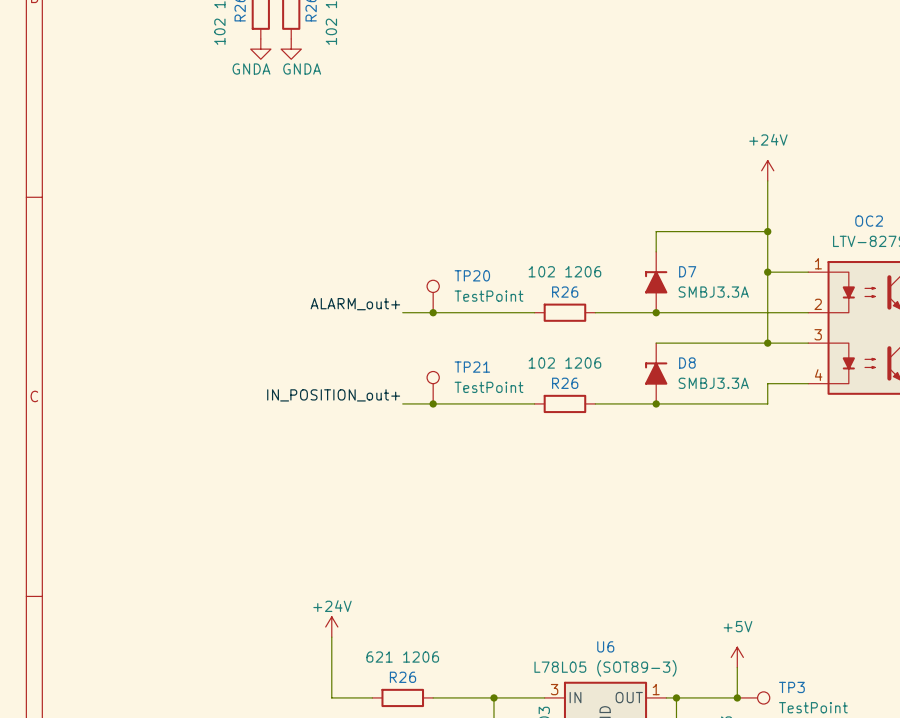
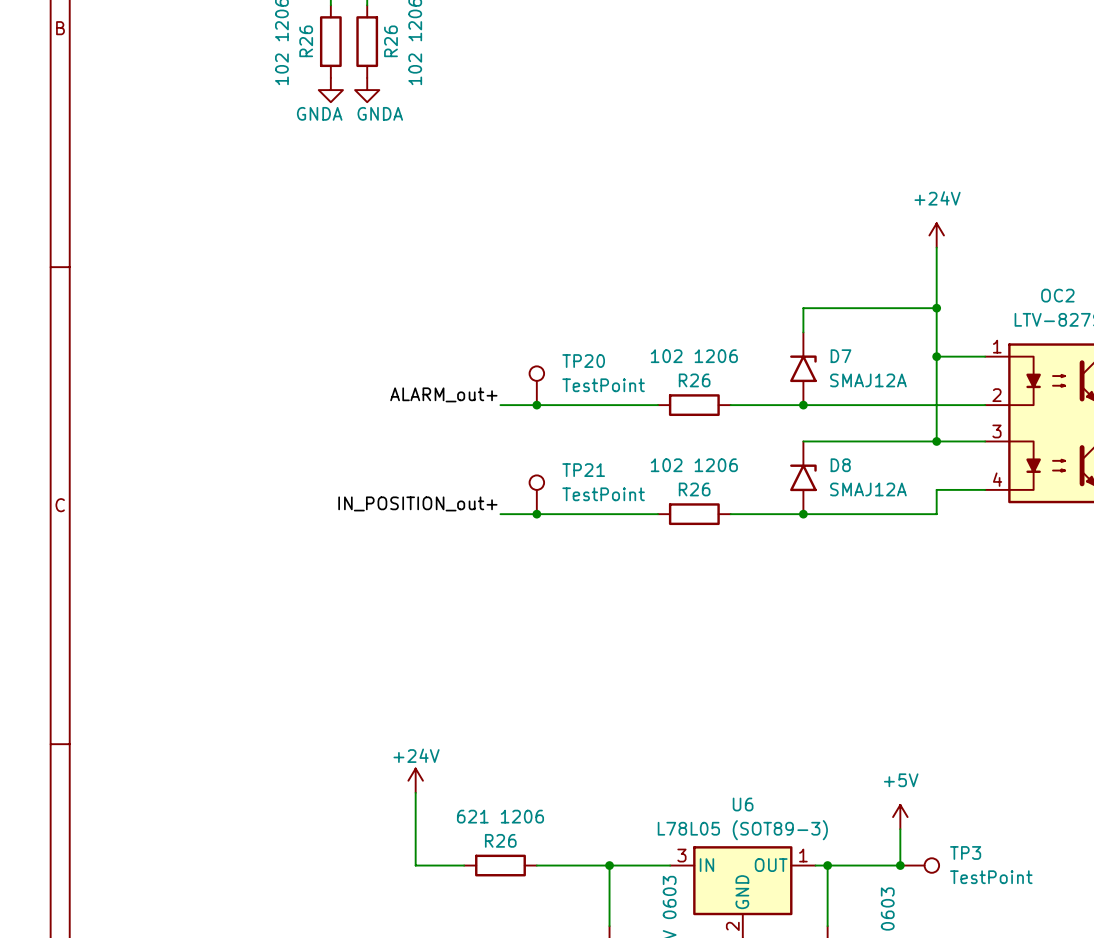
D7 symbol: [645, 251, 668, 313] -> [790, 332, 817, 406]
D7 value: SMBJ3.3A (713, 292) -> SMAJ12A (868, 380)
D8 symbol: [645, 343, 668, 404] -> [790, 441, 817, 515]
D8 value: SMBJ3.3A (713, 383) -> SMAJ12A (868, 489)

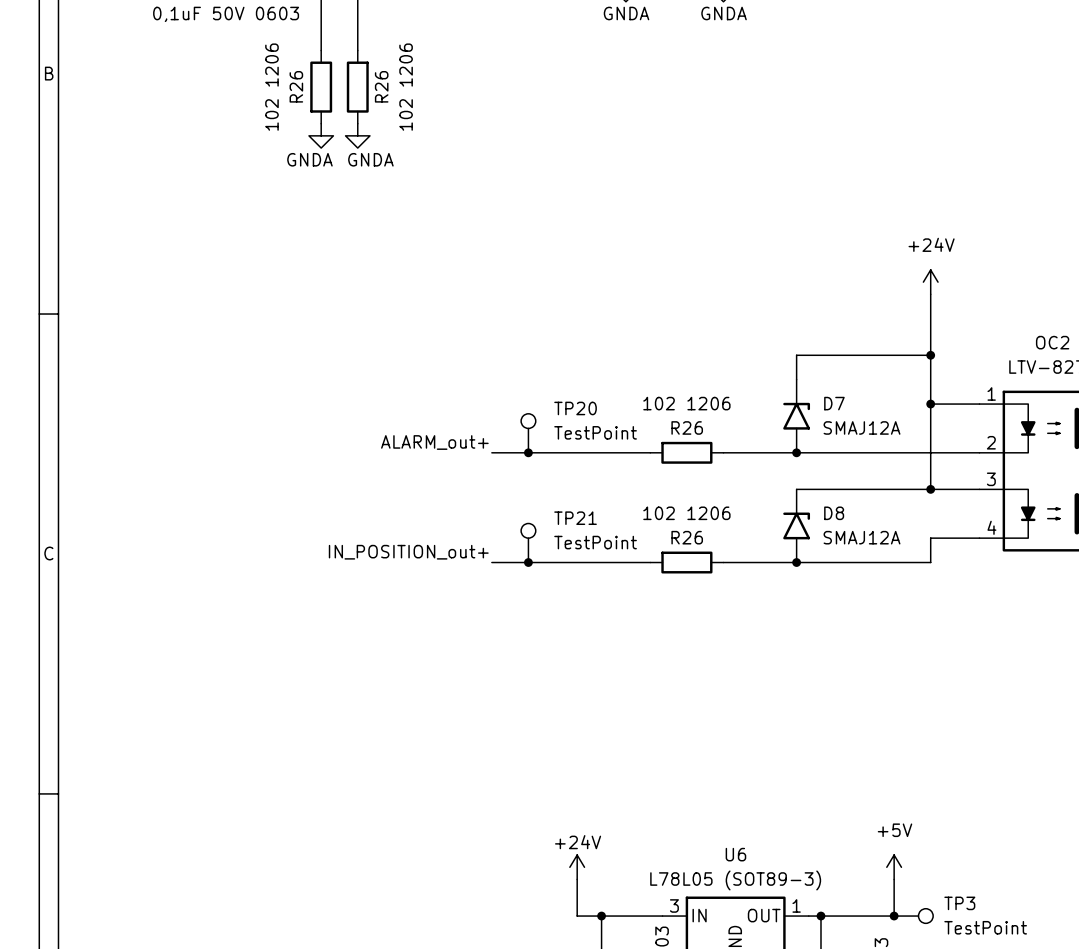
power symbol position: +24V (415, 780) -> +24V (577, 867)
wire: (415, 792) (415, 865) (464, 865) -> none
R26: 621 1206 (500, 865) -> none
wire: (536, 865) (585, 865) -> (577, 879) (577, 916)

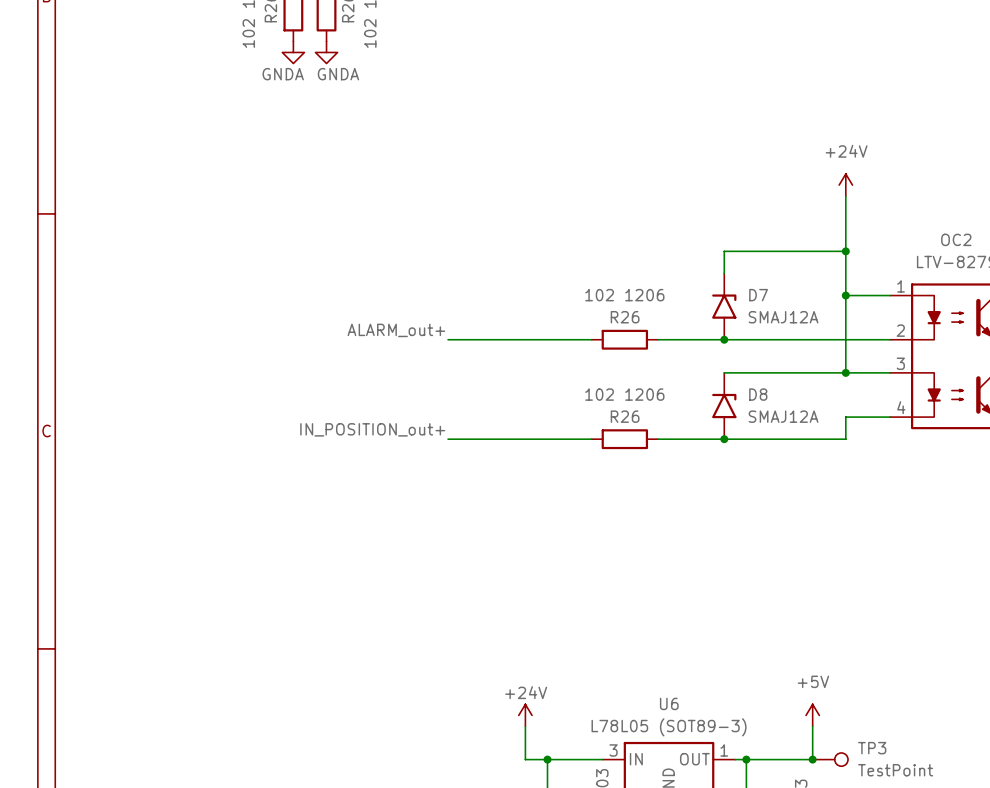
TP20: TestPoint (528, 433) -> none
junction: (528, 452) -> none
TP21: TestPoint (528, 543) -> none
junction: (528, 562) -> none

